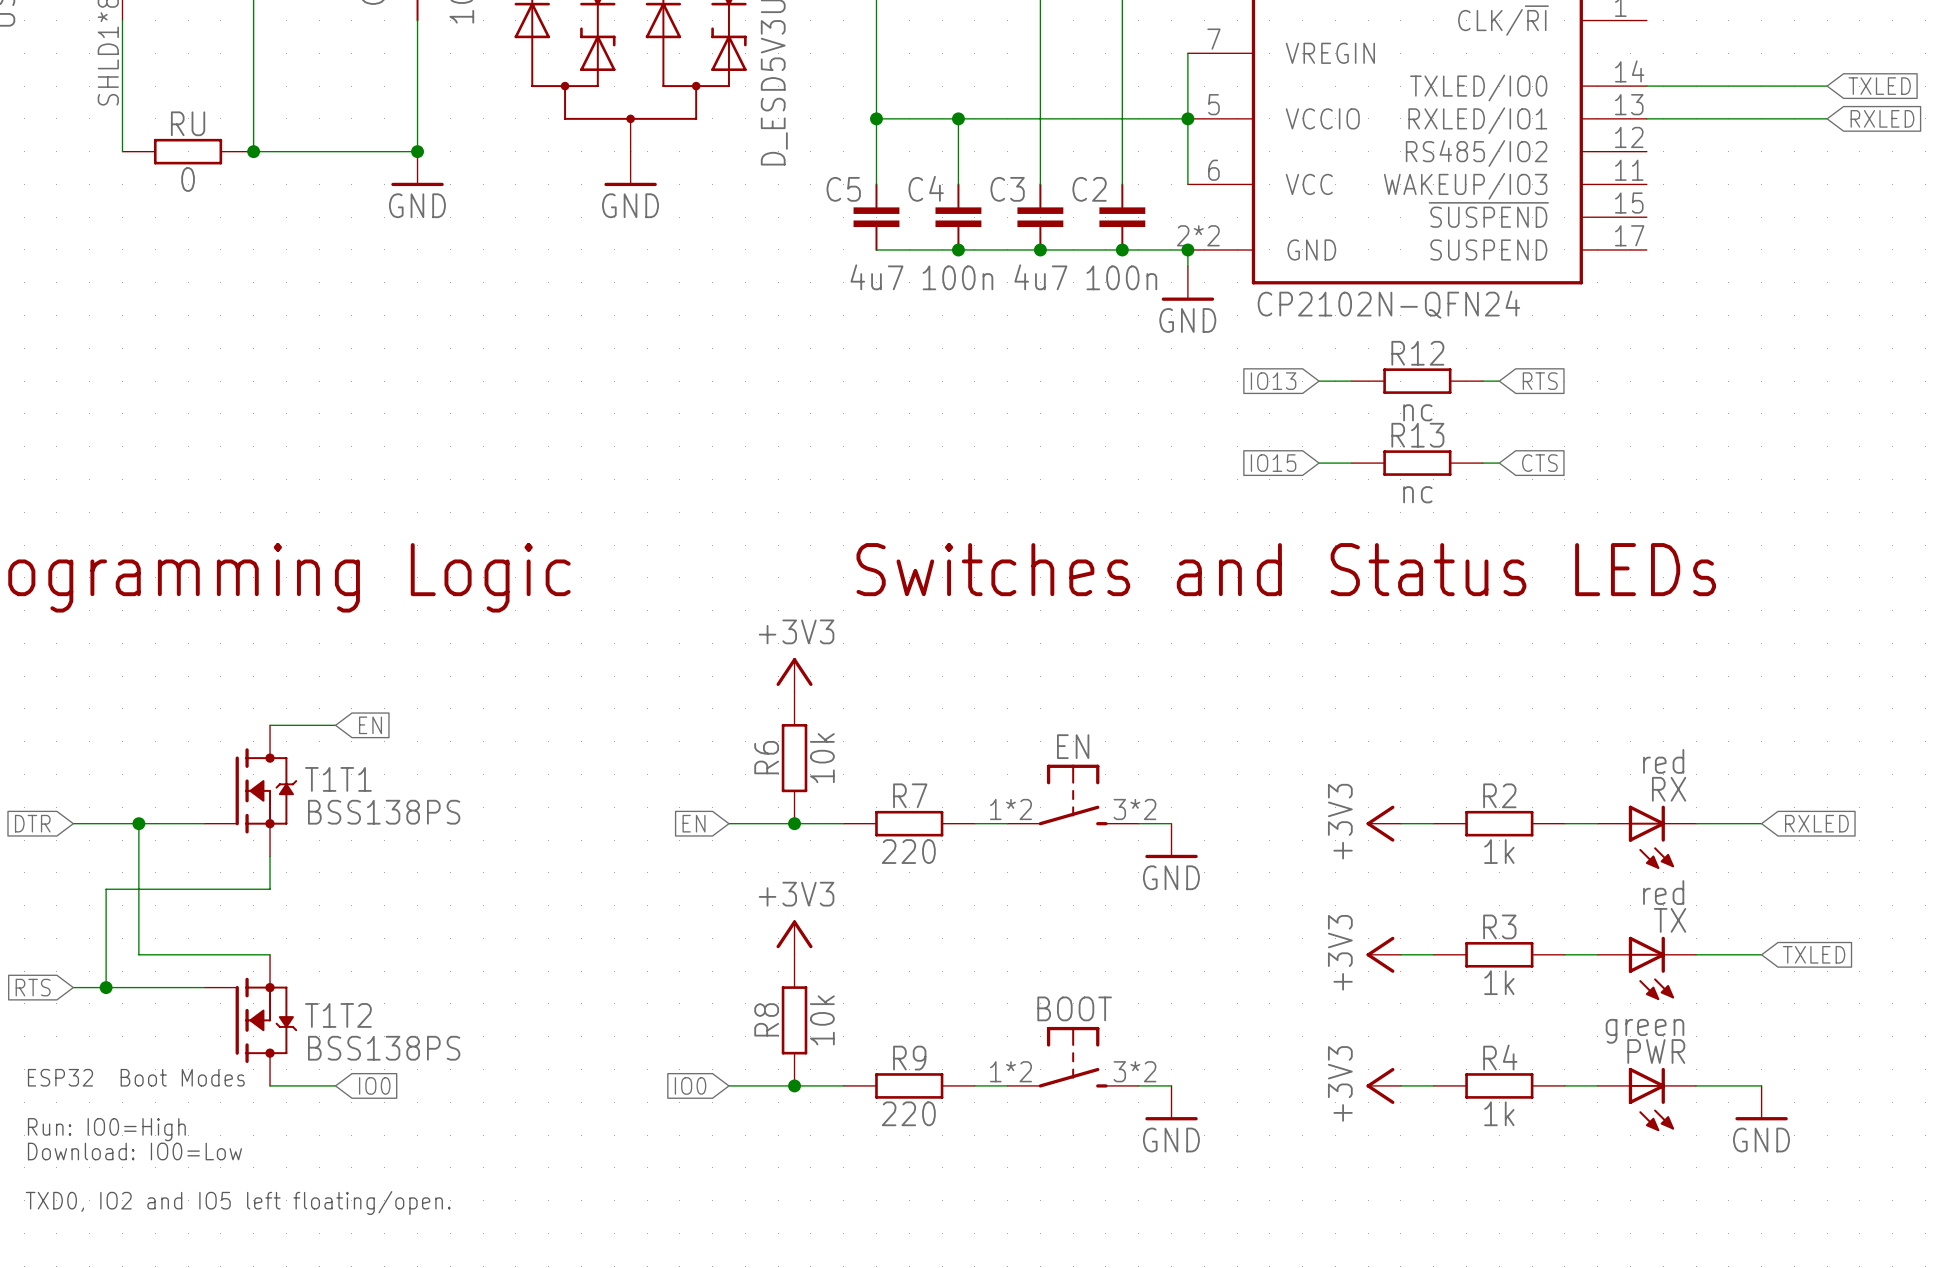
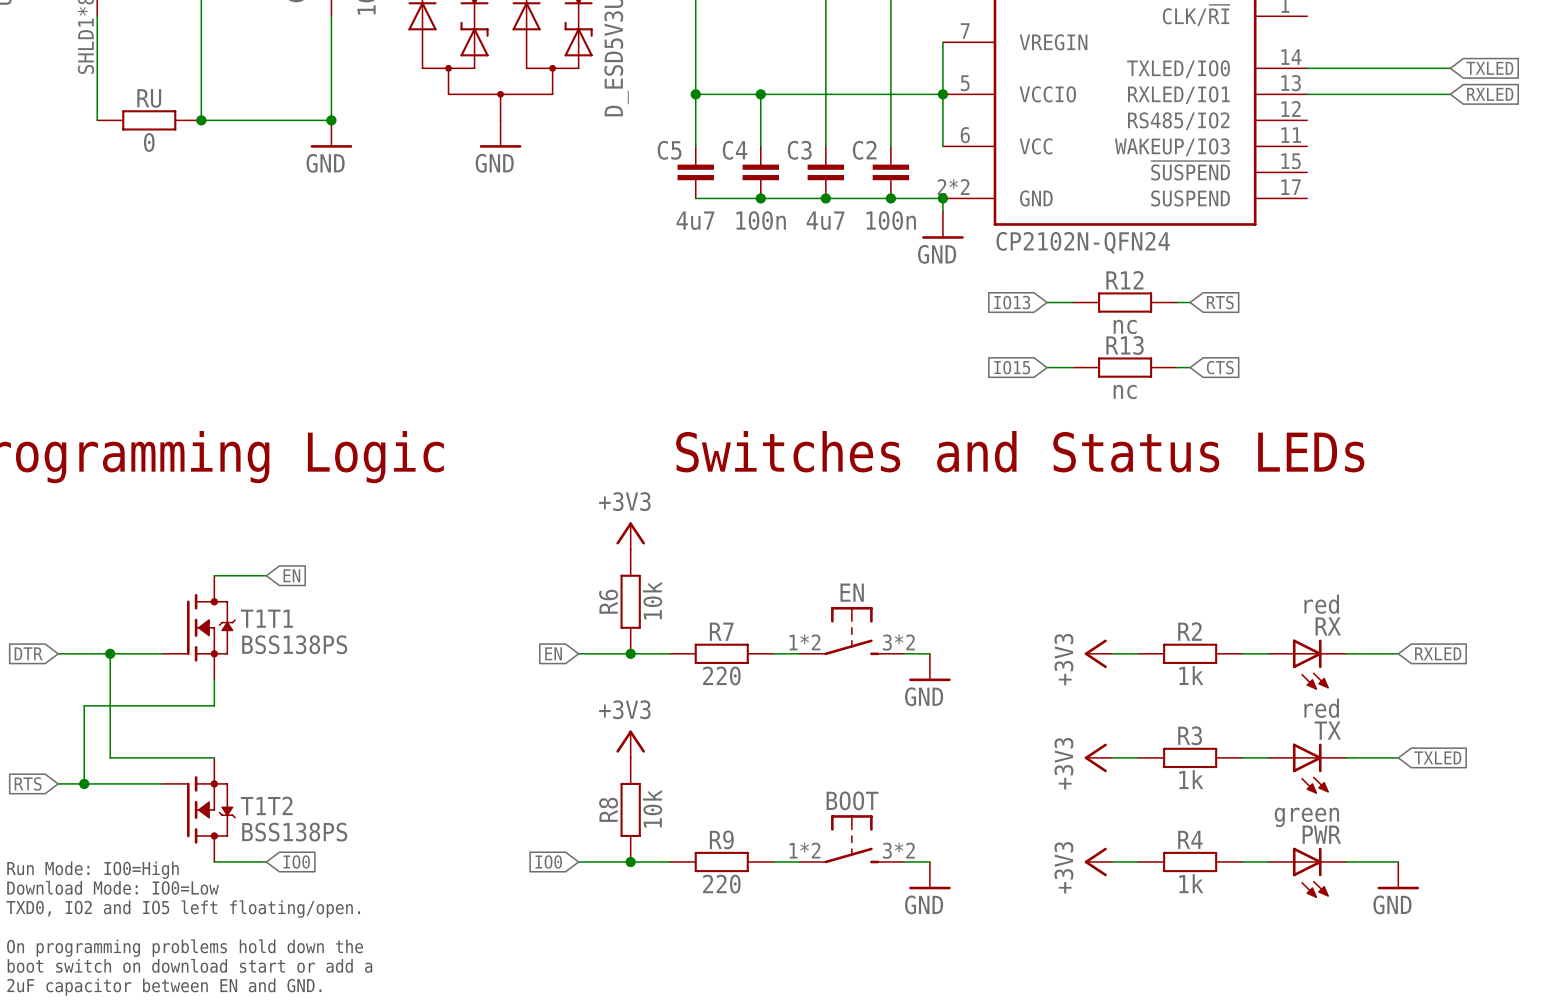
text: ESP32 Boot Modes (136, 1077) -> none
text: Run: IO0=High (106, 1129) -> Run Mode: IO0=High (93, 870)
text: Download: IO0=Low (134, 1151) -> Download Mode: IO0=Low (113, 887)
text: none -> On programming problems hold down the (185, 948)
text position: TXD0, IO2 and IO5 left floating/open. (238, 1203) -> TXD0, IO2 and IO5 left floating/open. (183, 909)
text: none -> boot switch on download start or add a (189, 965)
text: none -> 2uF capacitor between EN and GND. (164, 987)

